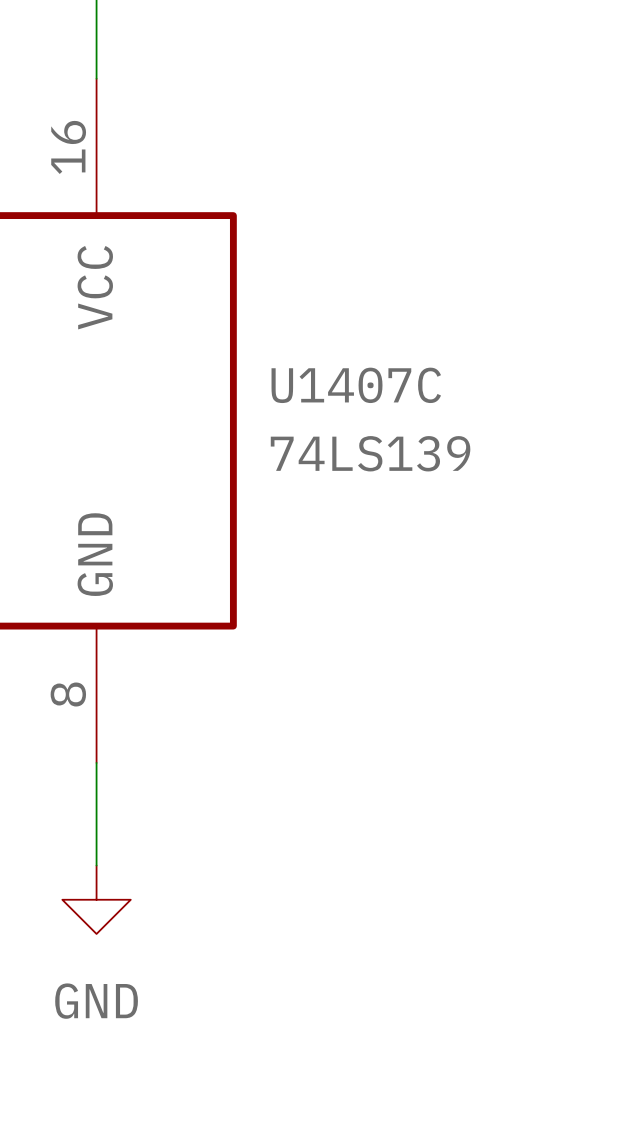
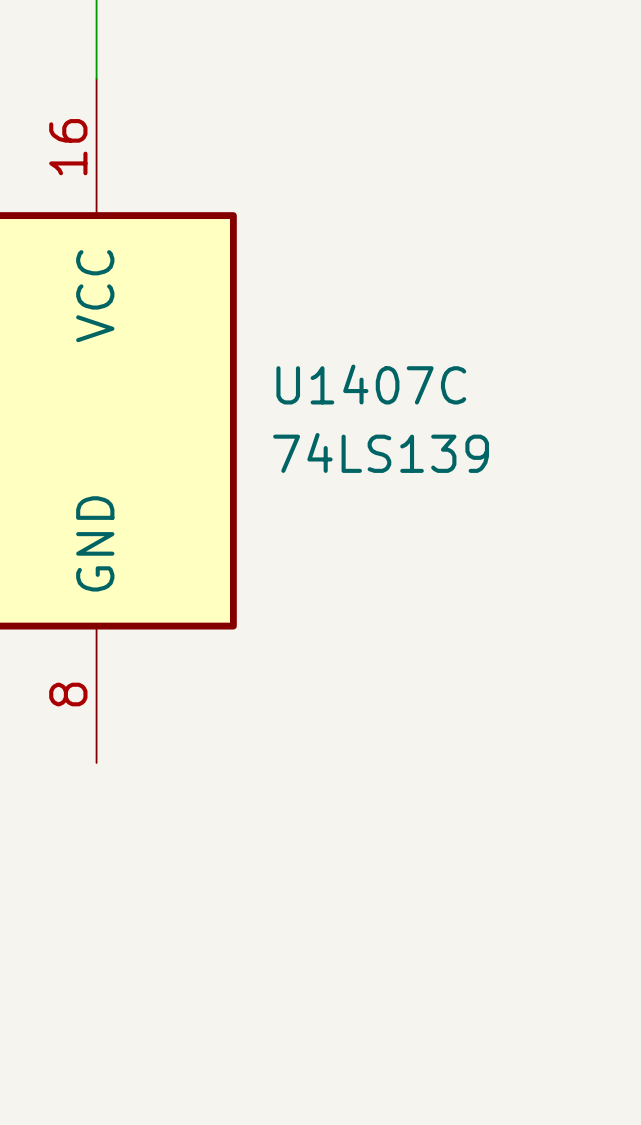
wire: (96, 762) (96, 865) -> none
power symbol: GND (96, 899) -> none

